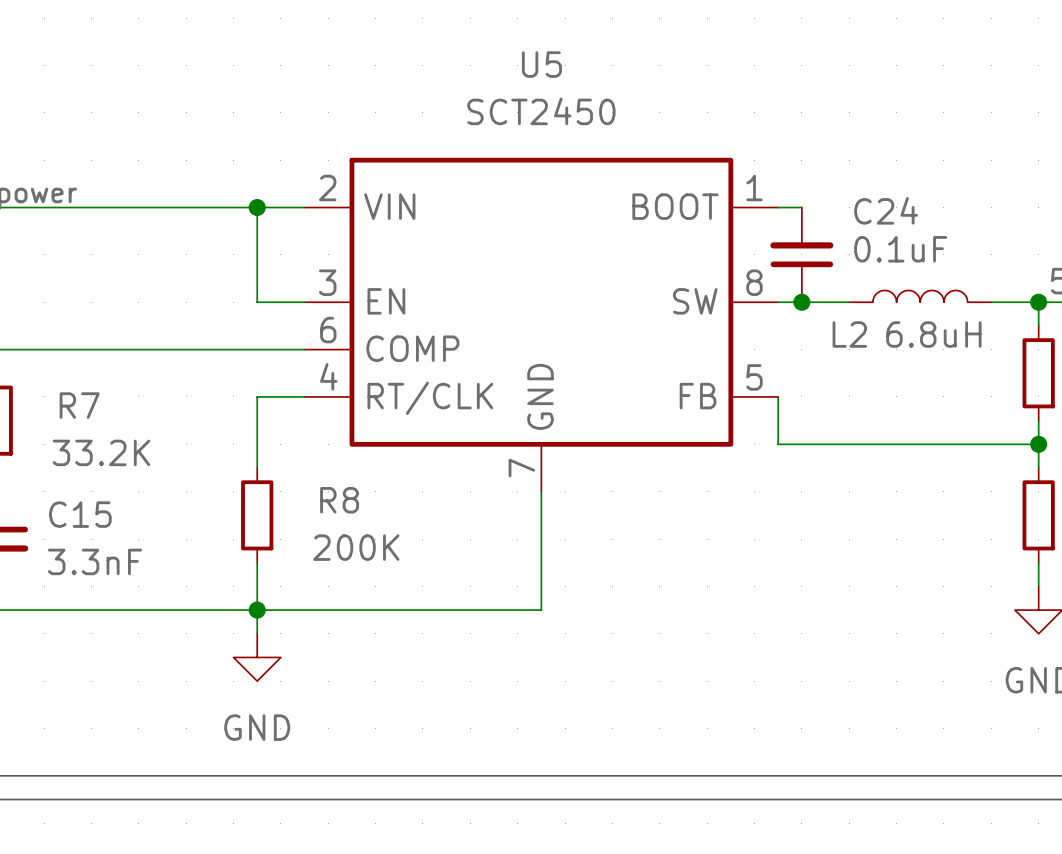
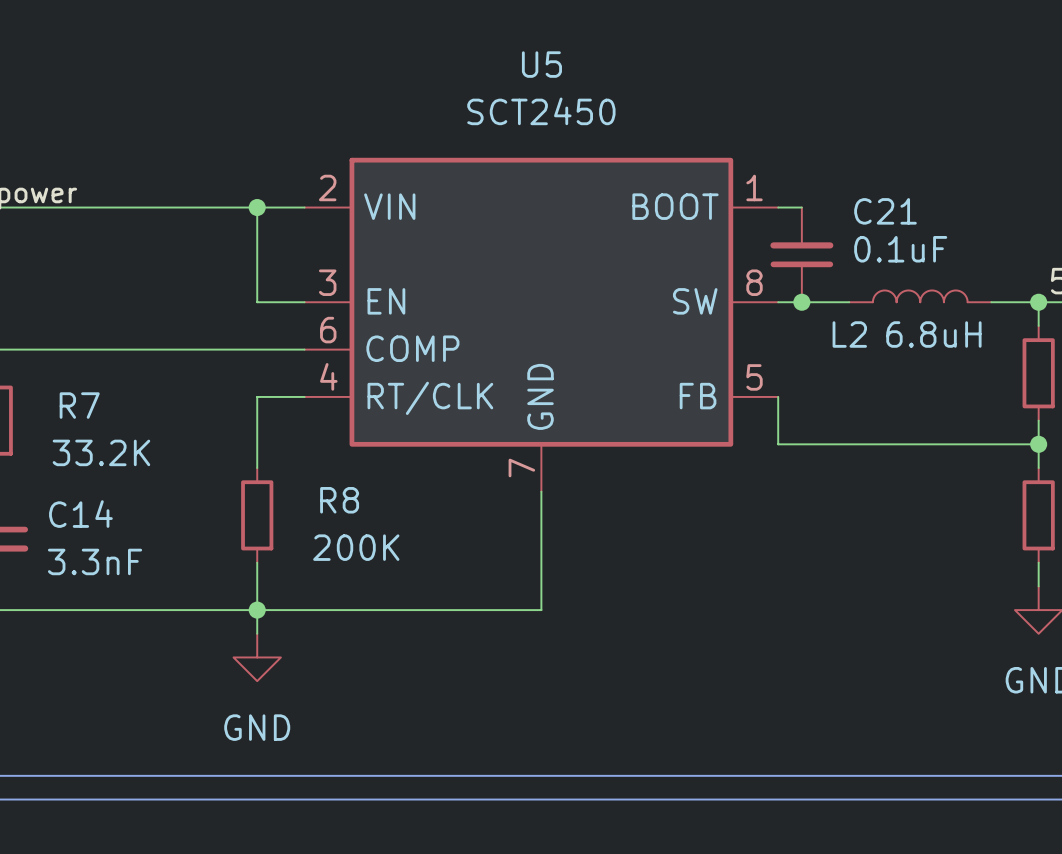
C24 name: C24 (886, 210) -> C21 (885, 211)
C15 name: C15 (80, 514) -> C14 (80, 514)

